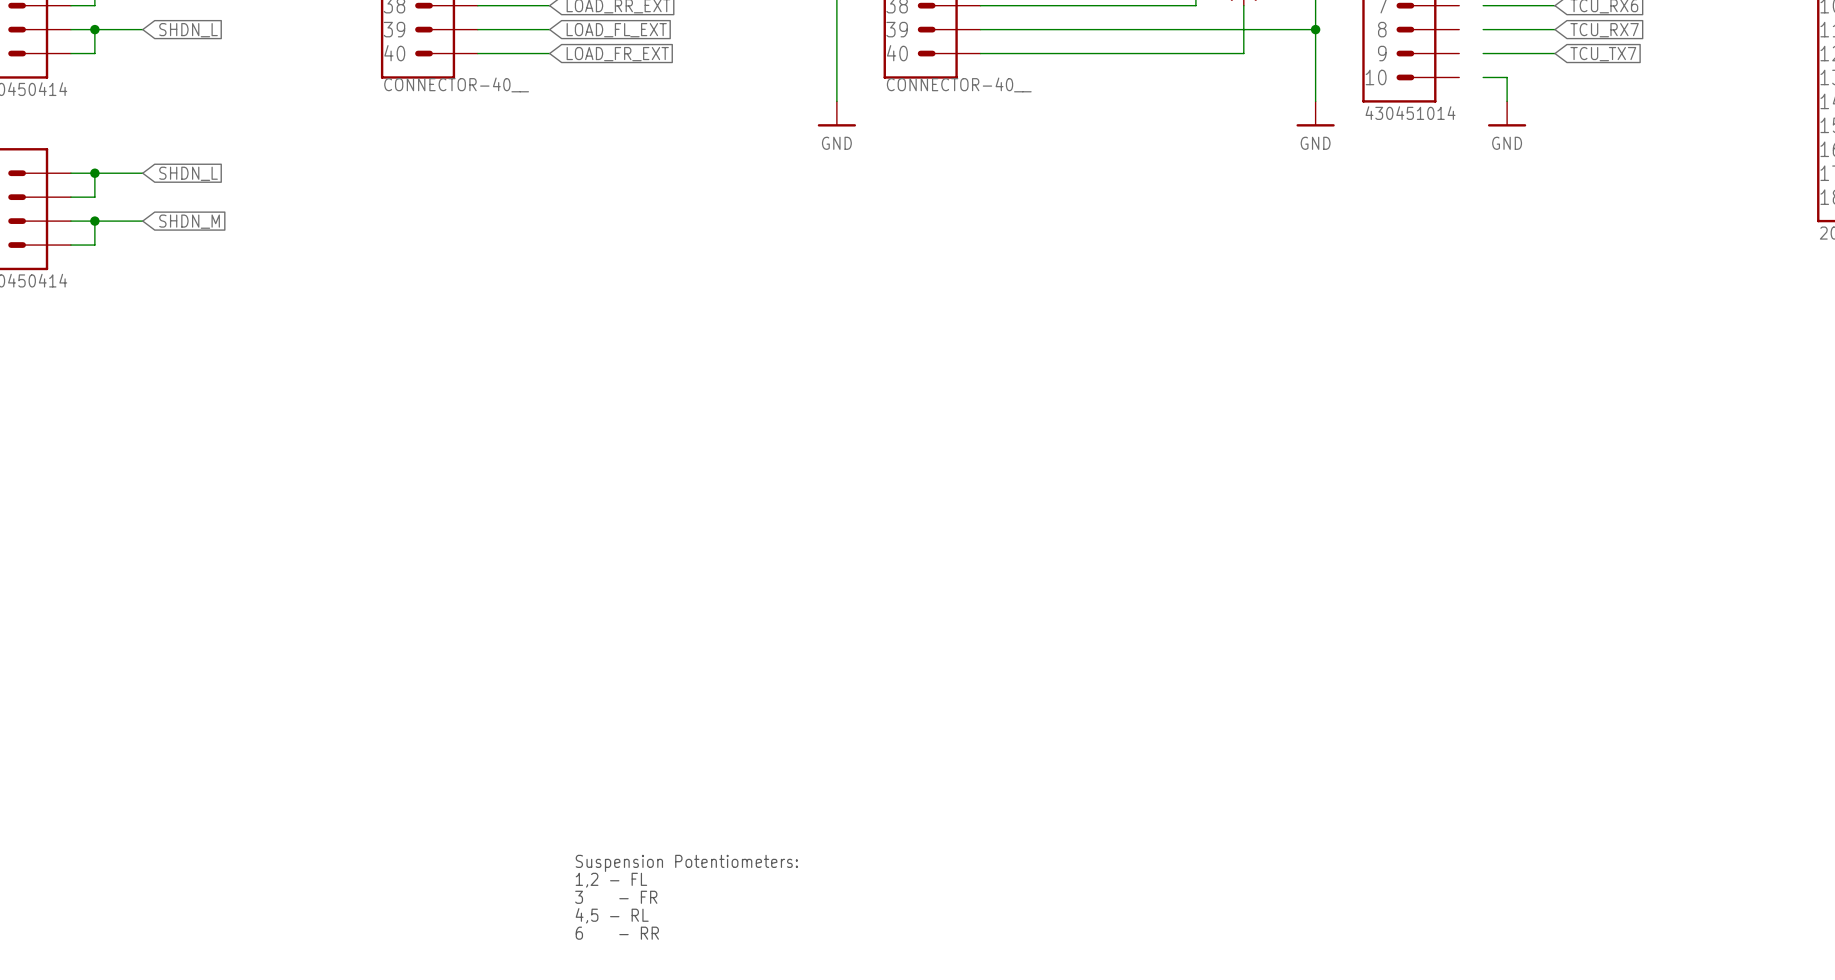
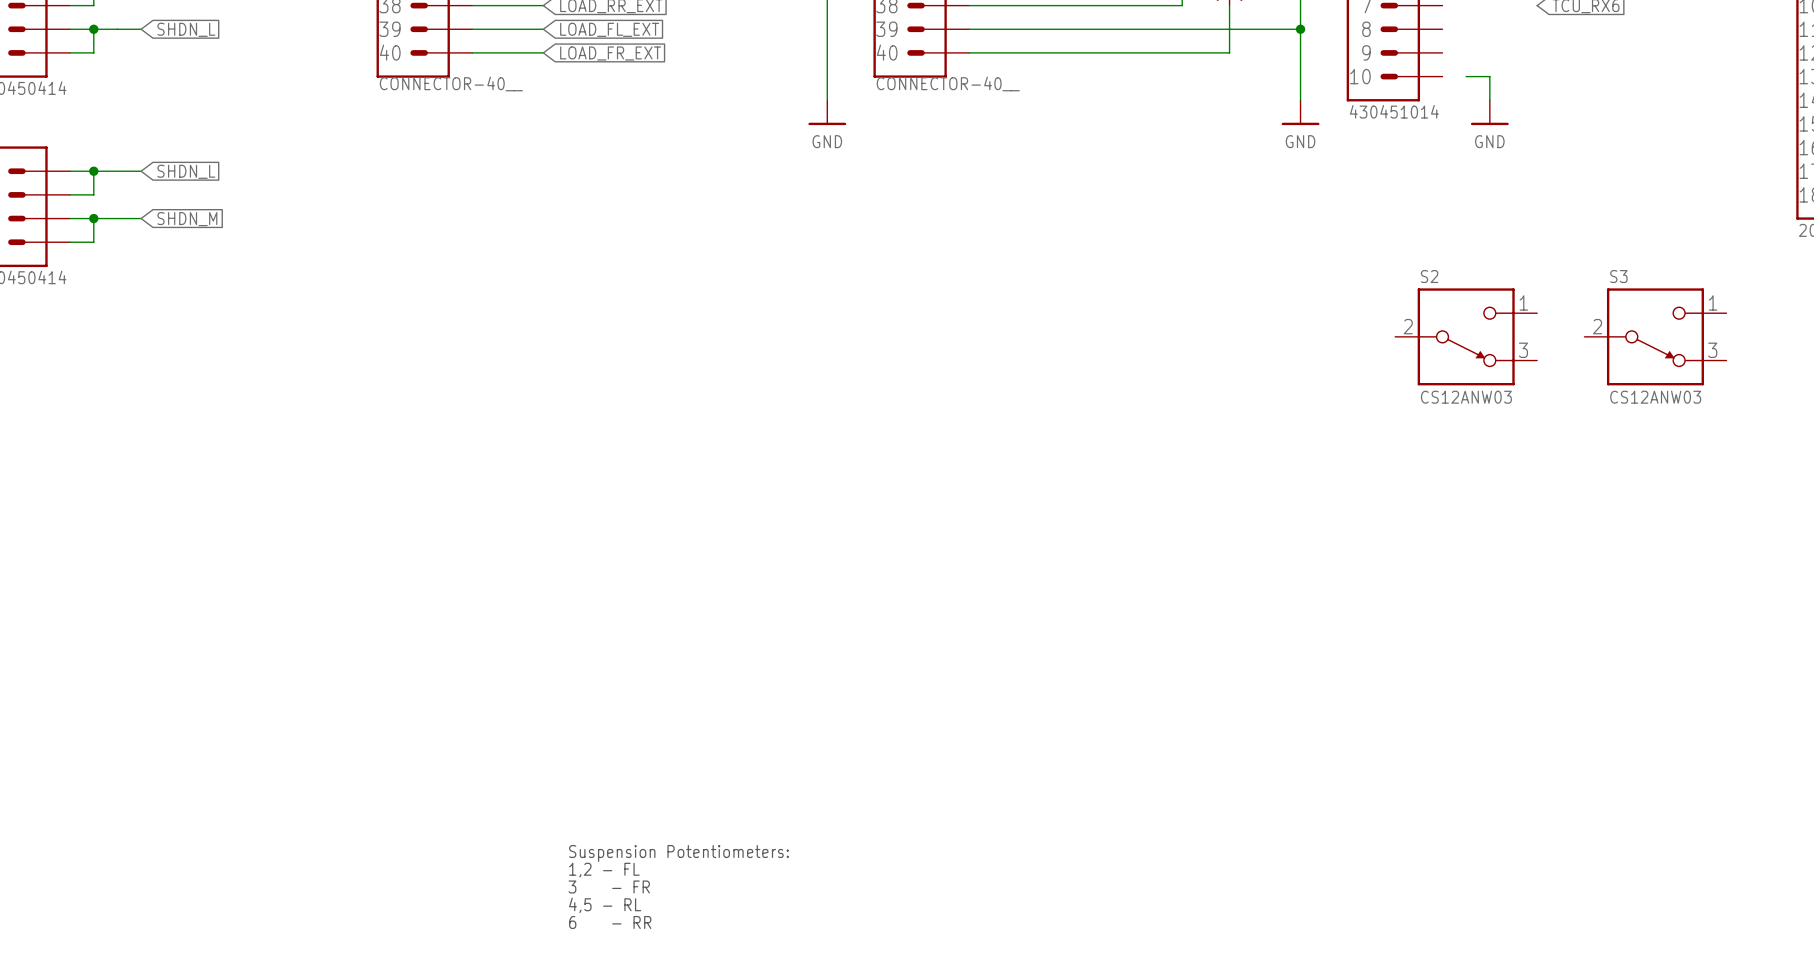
wire: (1483, 5) (1554, 5) -> none
wire: (1483, 29) (1554, 29) -> none
global label: TCU_RX7 (1604, 30) -> none
wire: (1483, 53) (1554, 53) -> none
global label: TCU_TX7 (1603, 54) -> none
S2: none -> (1466, 336)
S3: none -> (1655, 336)

